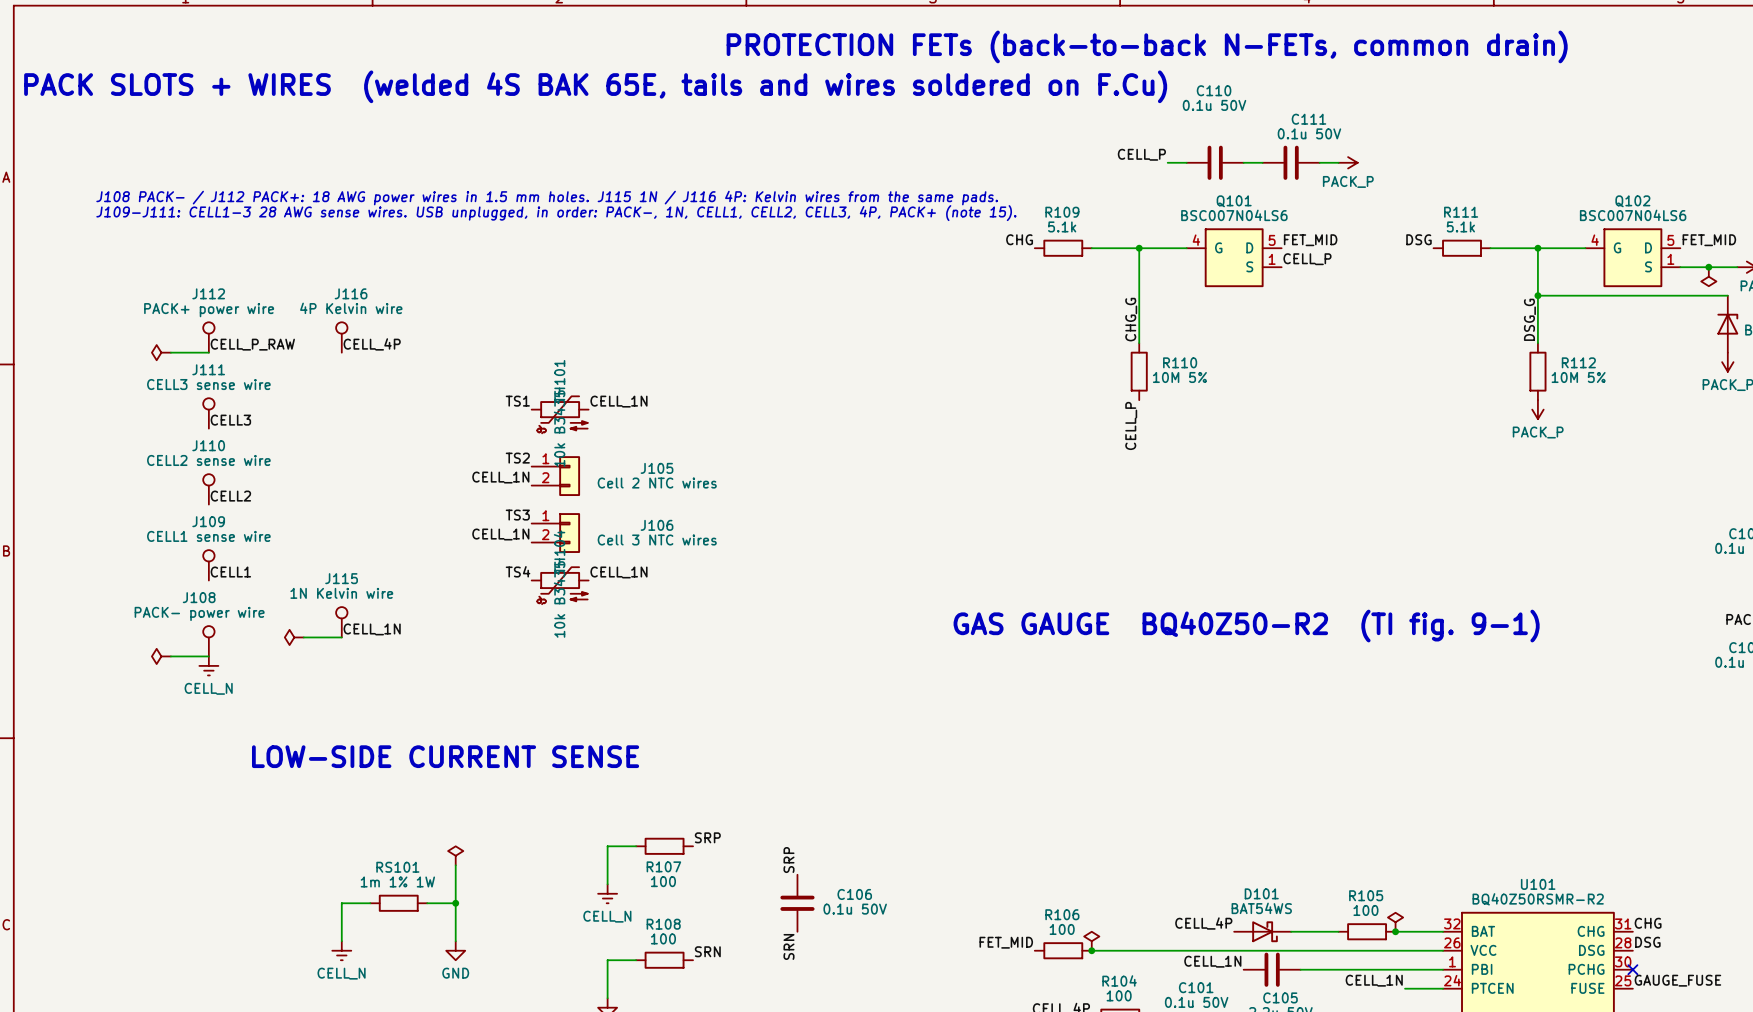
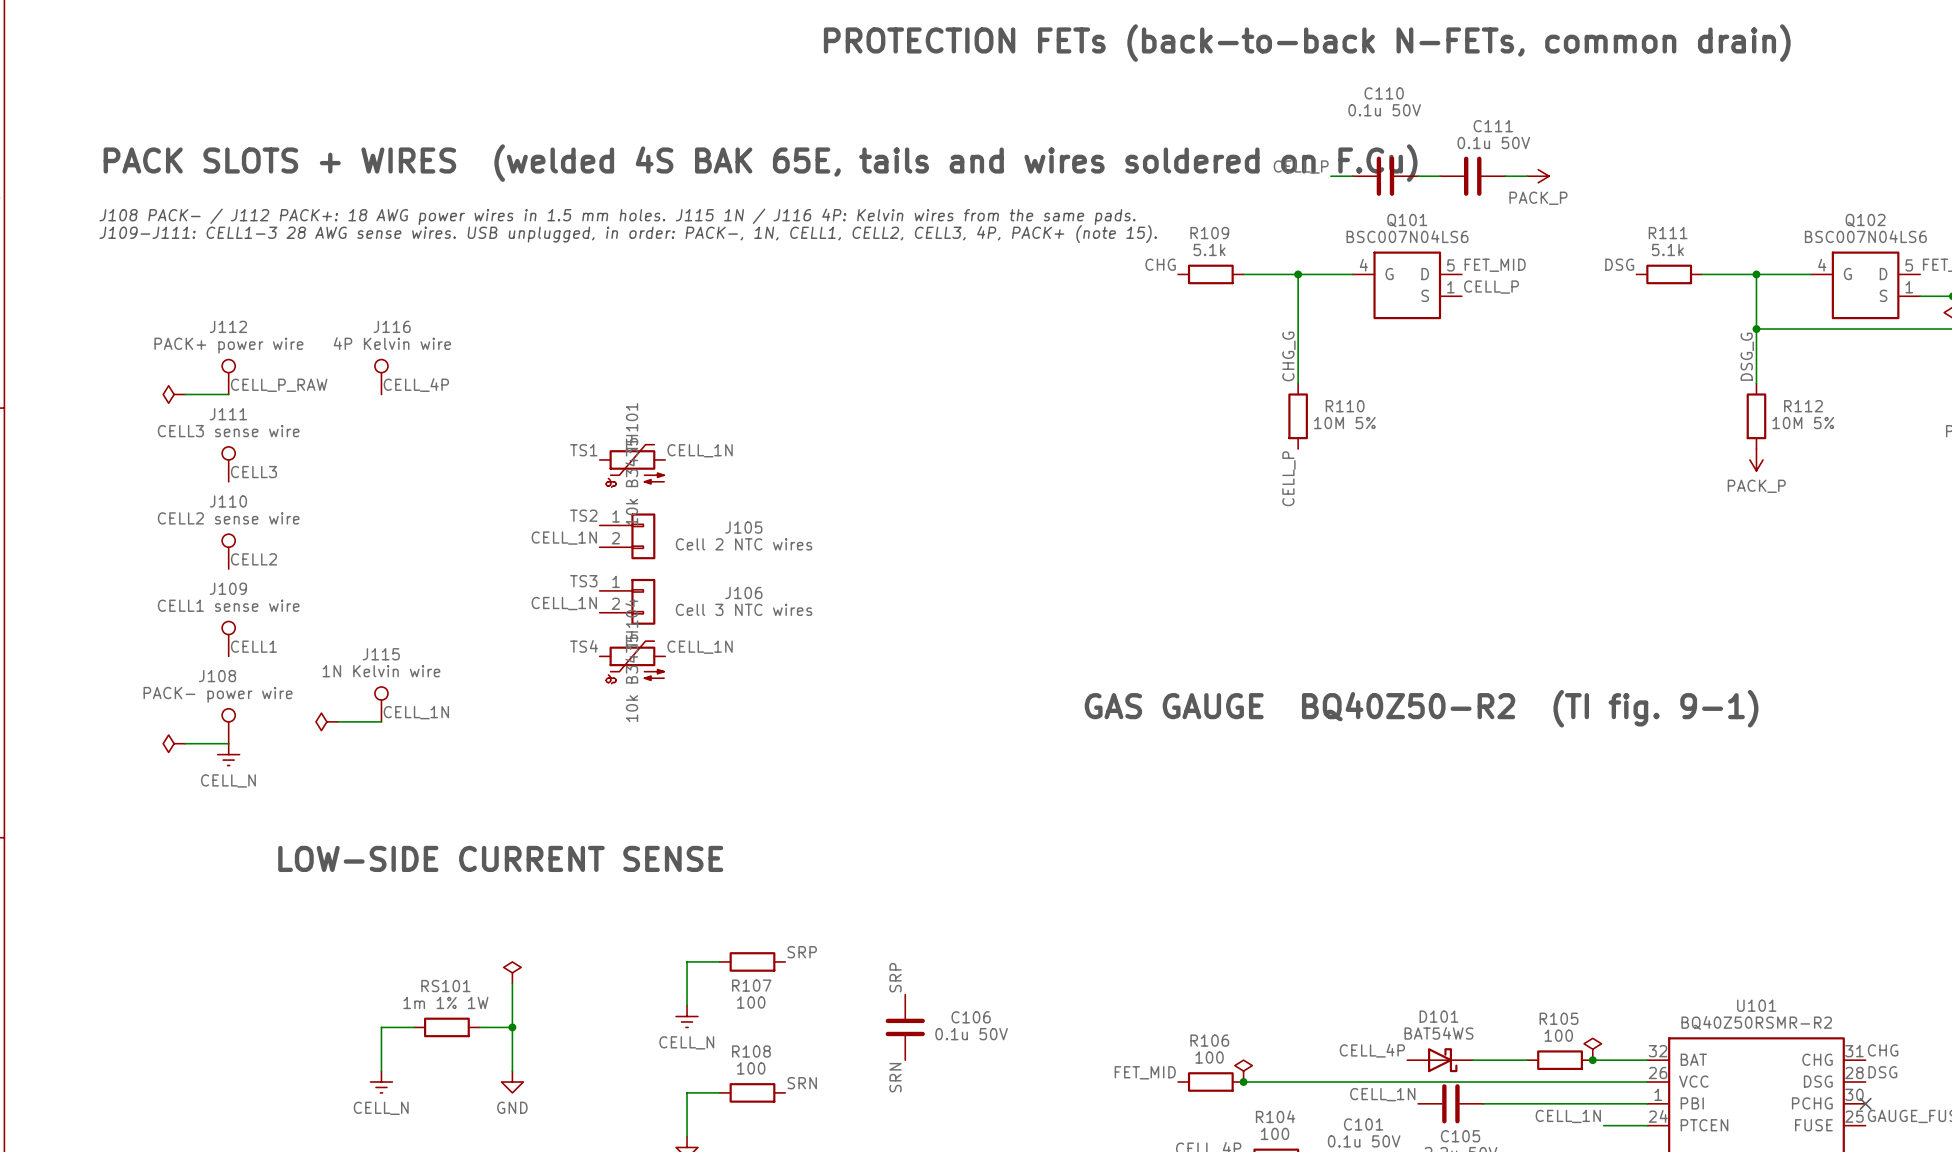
text position: PACK SLOTS + WIRES (welded 4S BAK 65E, tails and wires soldered on F.Cu) (595, 86) -> PACK SLOTS + WIRES (welded 4S BAK 65E, tails and wires soldered on F.Cu) (760, 163)

